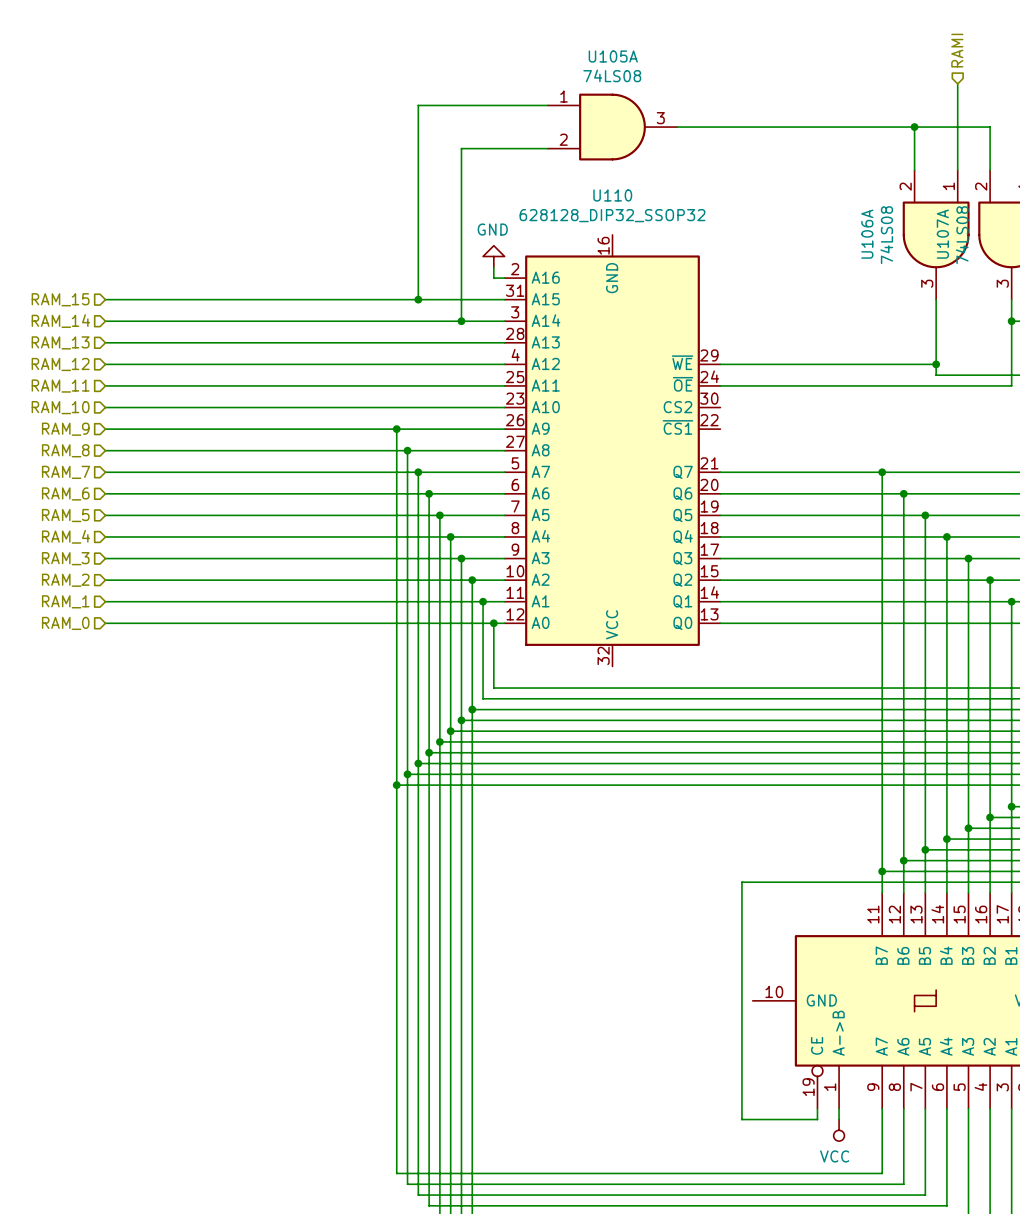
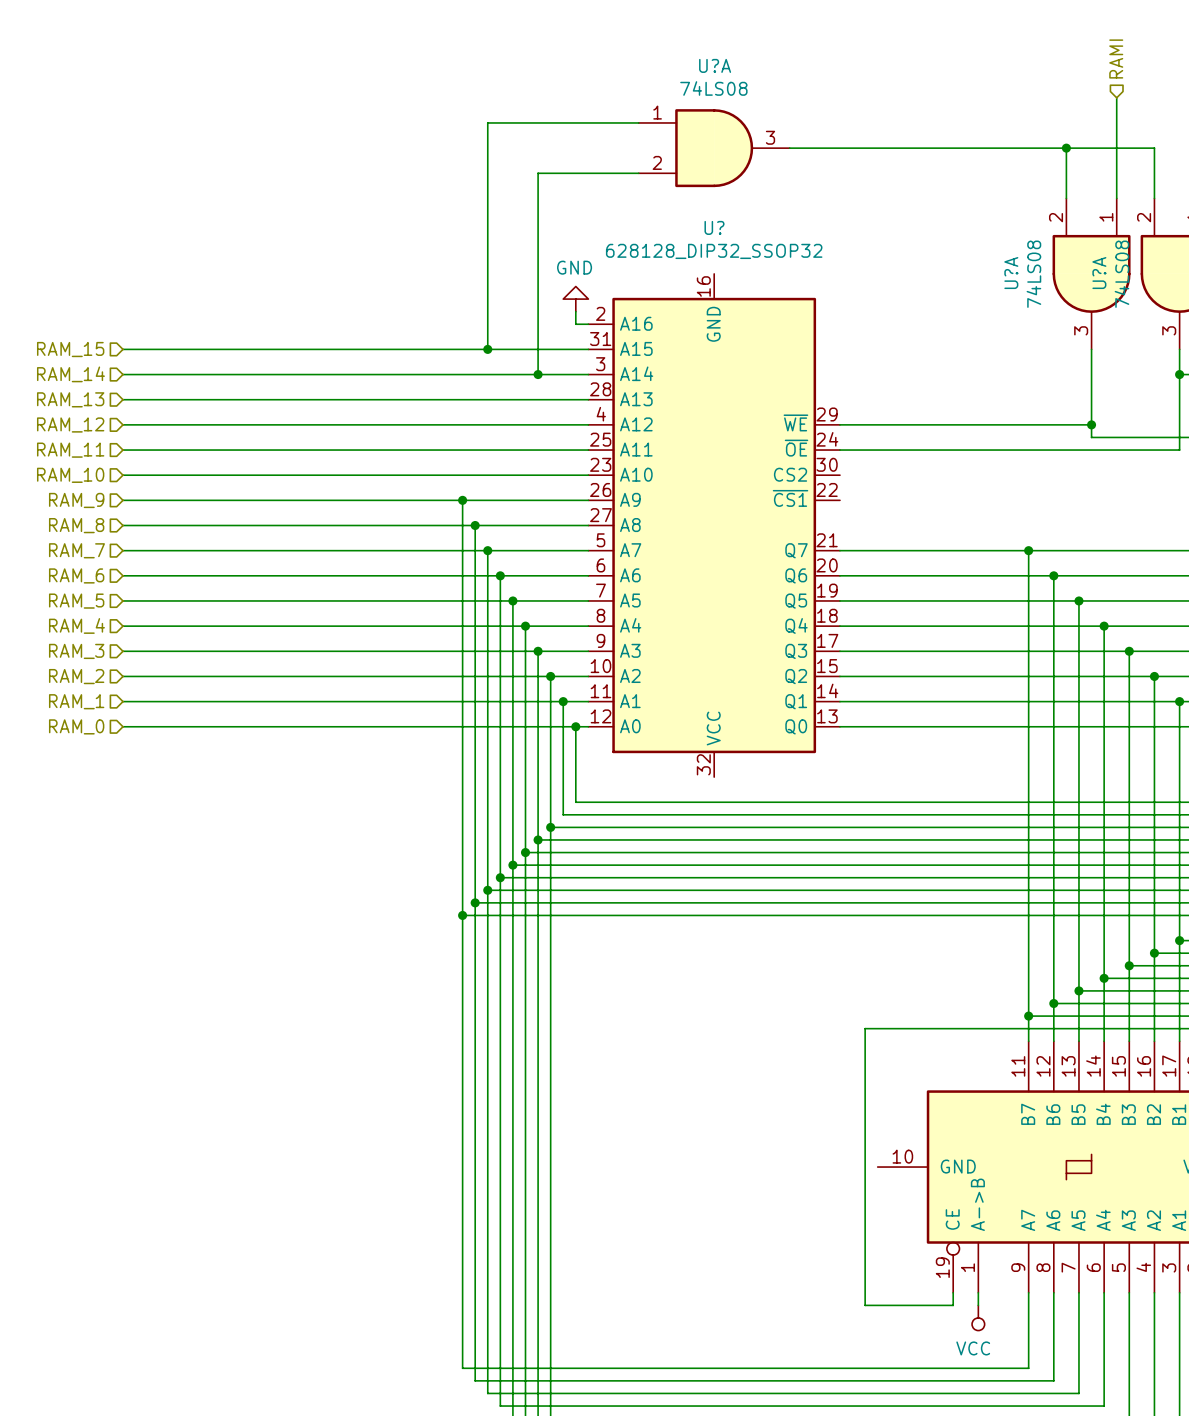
U105A name: U105A (613, 56) -> U?A (715, 65)
U110 name: U110 (612, 195) -> U? (714, 227)
U106A name: U106A (867, 234) -> U?A (1011, 273)
U107A name: U107A (942, 234) -> U?A (1099, 273)

